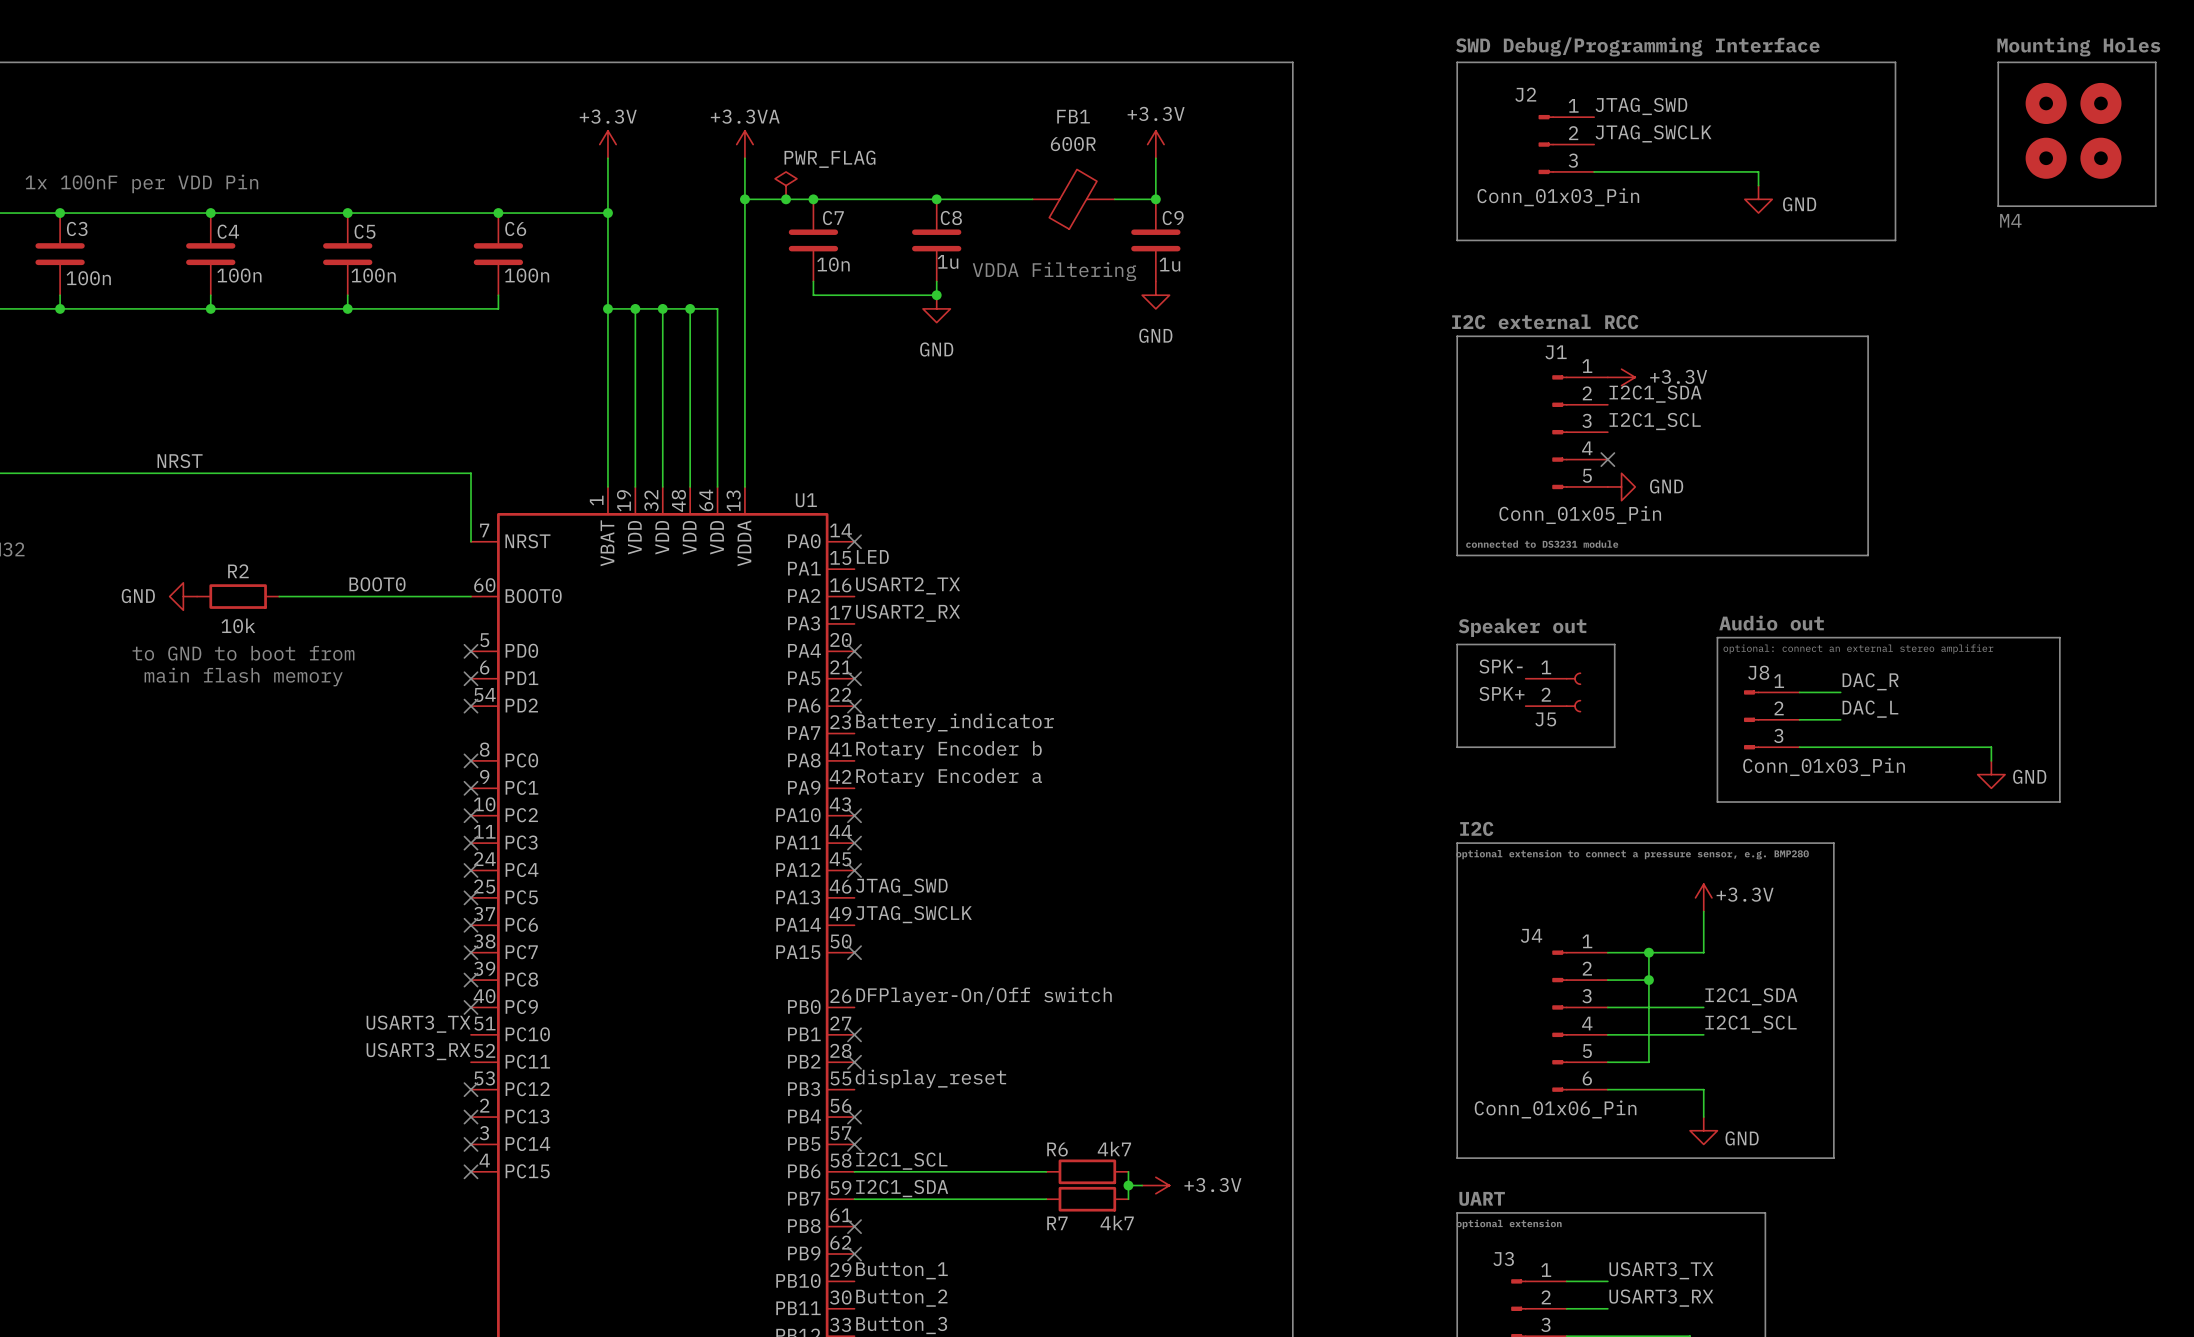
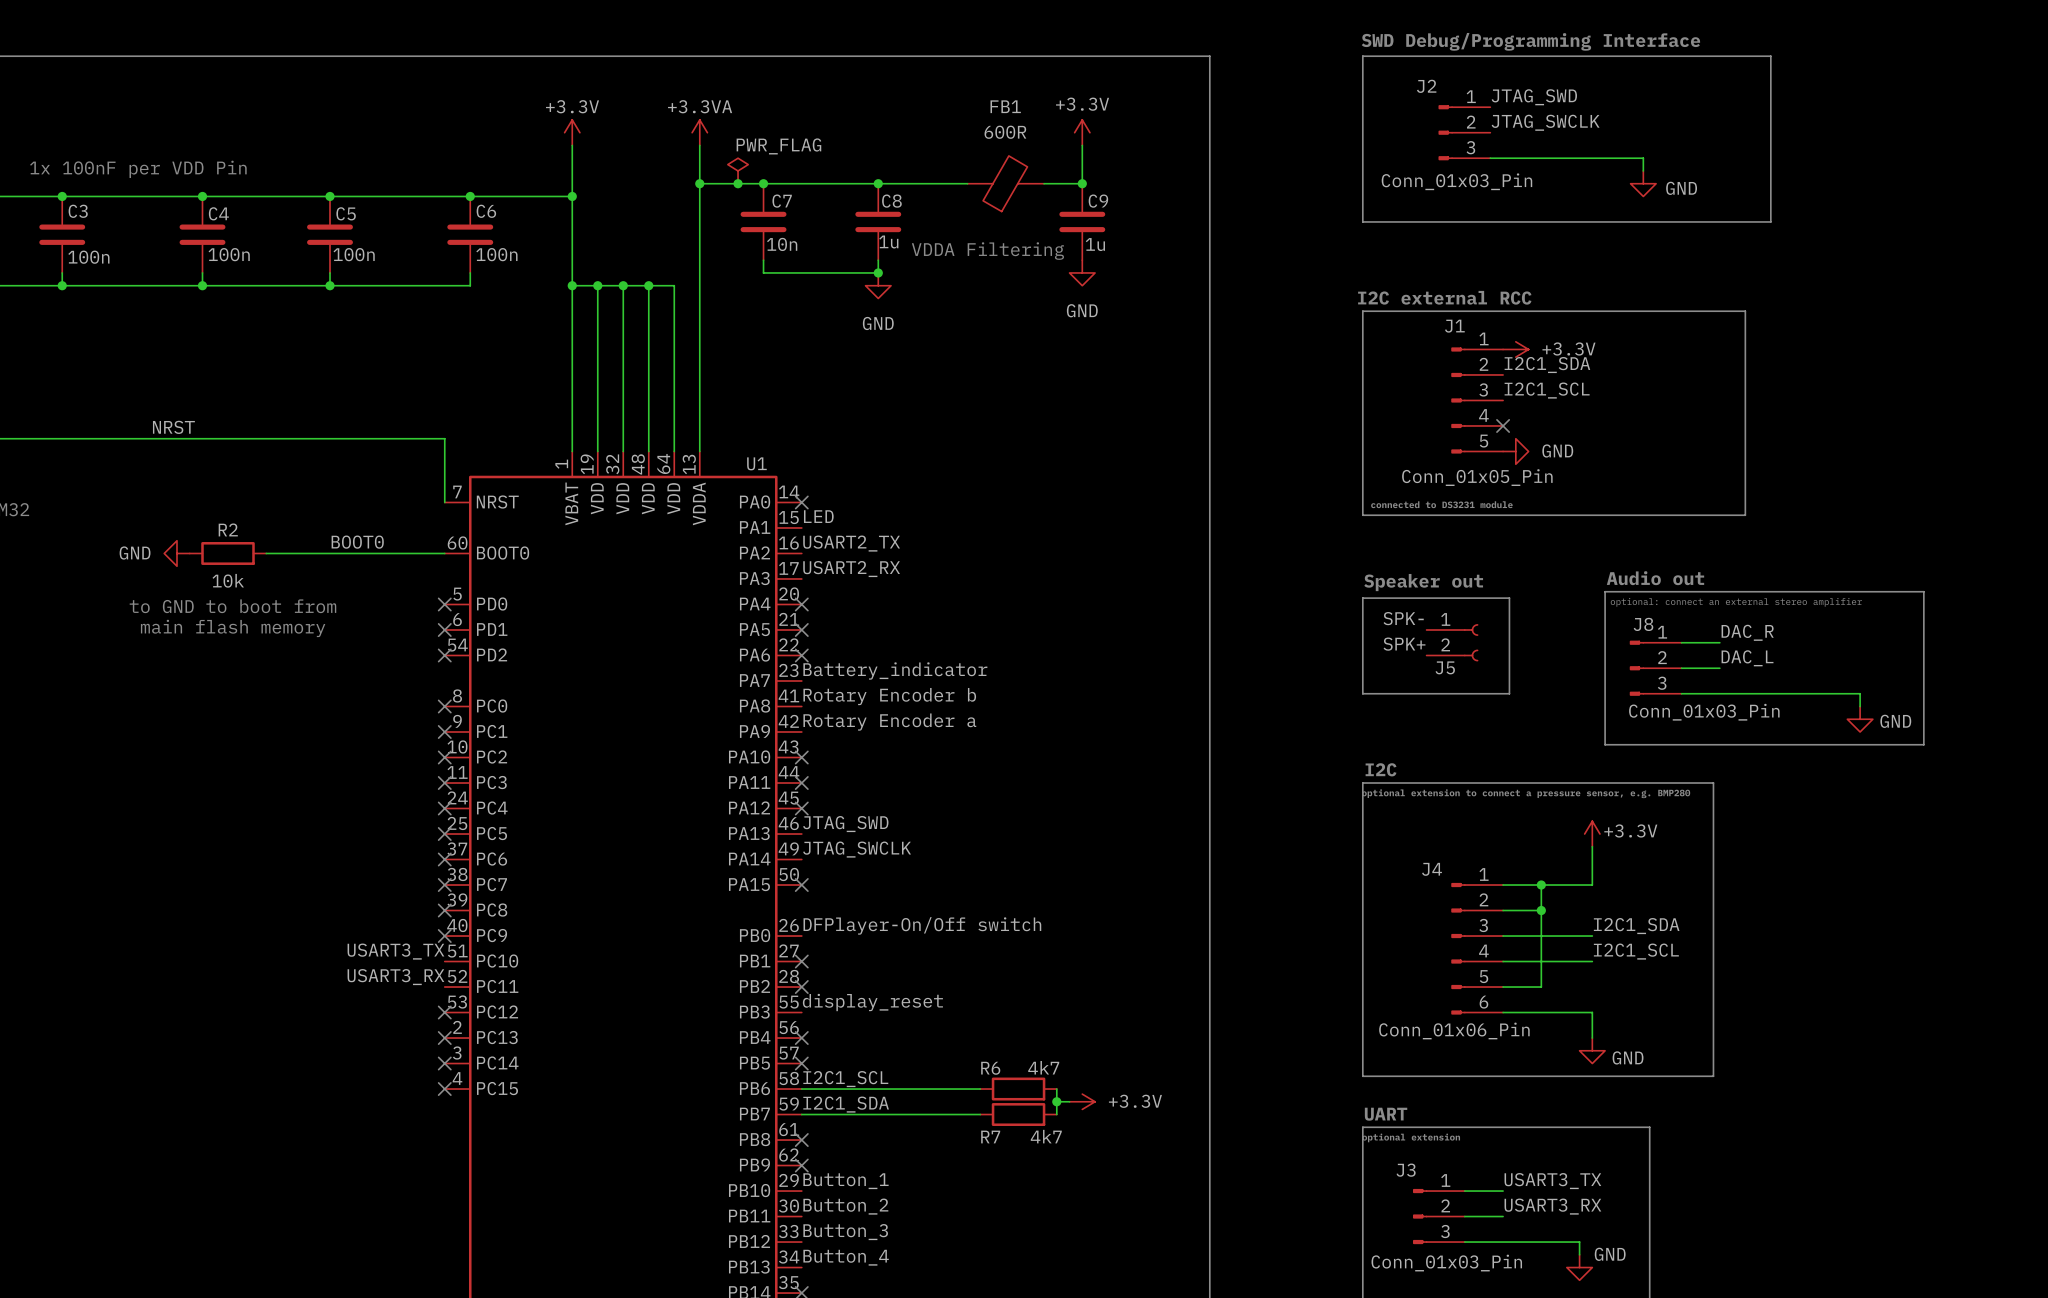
text: Mounting Holes (2078, 47) -> none
line: (1998, 62) (2155, 62) (2155, 206) (1998, 206) (1998, 62) -> none
part: (2046, 103) -> none
part: (2100, 103) -> none
part: (2046, 158) -> none
part: (2100, 158) -> none
text: M4 (2010, 220) -> none

